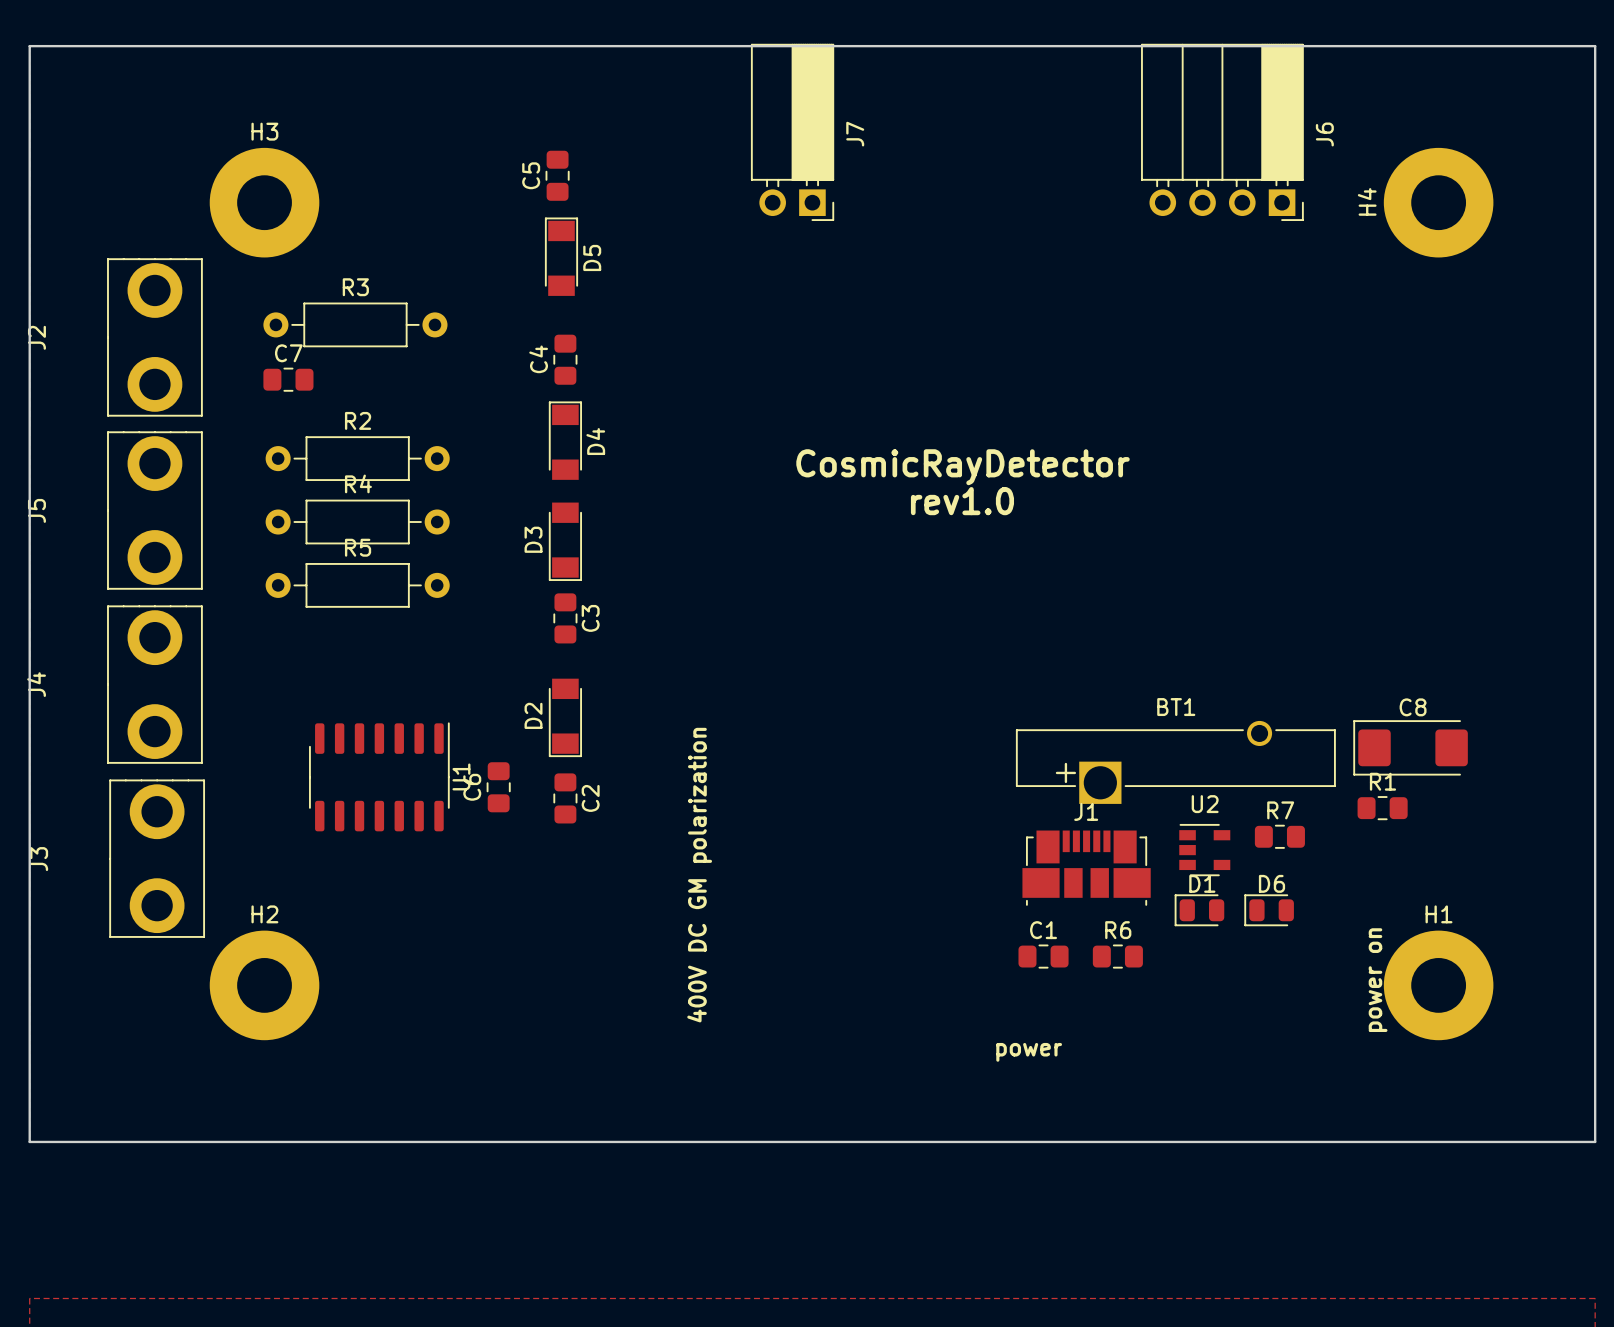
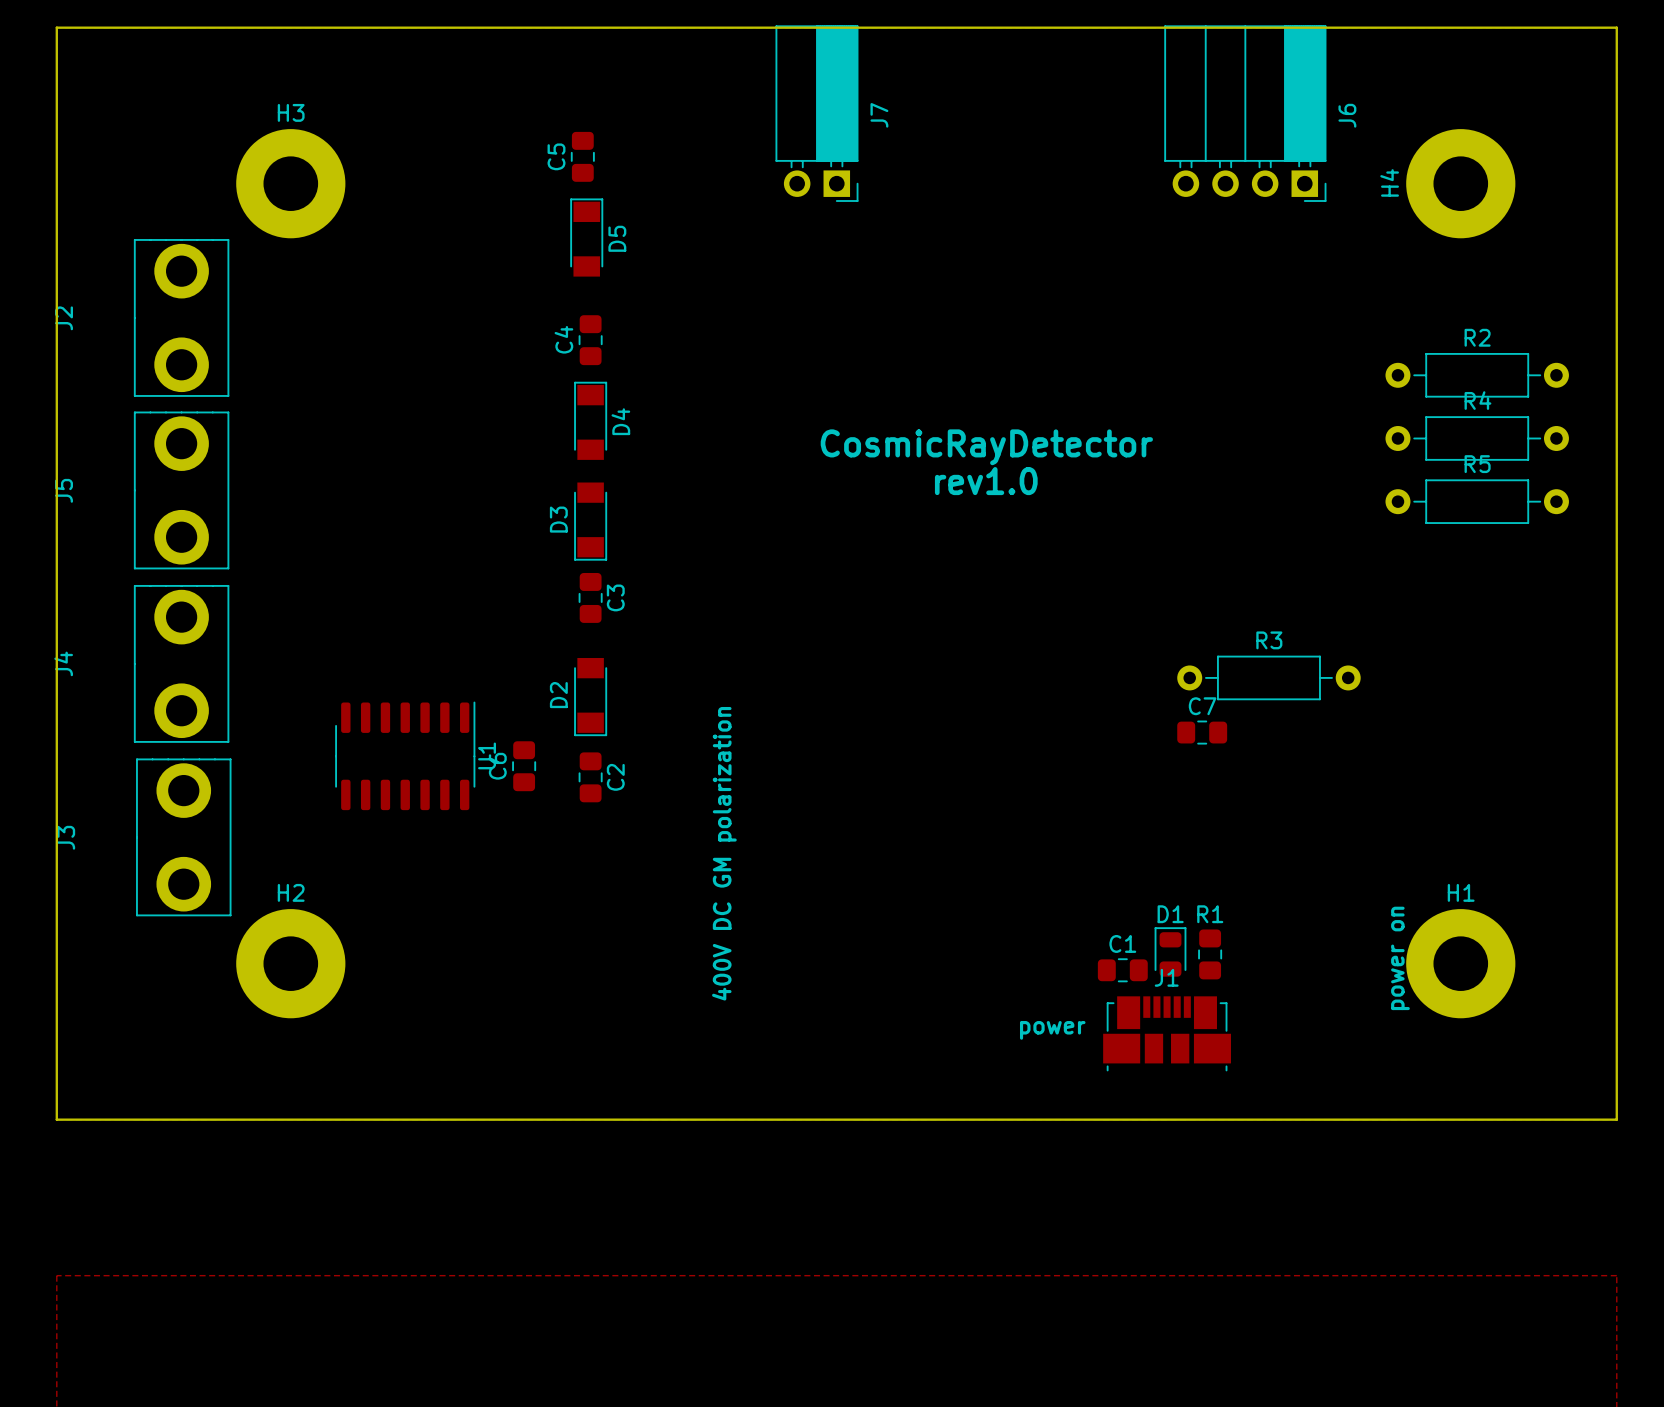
R3 position: (355, 324) -> (1268, 677)
C7 position: (288, 379) -> (1202, 732)
R2 position: (357, 458) -> (1477, 375)
R4 position: (357, 522) -> (1477, 438)
R5 position: (357, 585) -> (1477, 501)
C8: (1410, 747) -> none
BT1: (1175, 762) -> none
R1 rotation: 0° (1382, 808) -> 90° clockwise (1210, 954)
R1 position: (1382, 808) -> (1210, 954)
R7: (1279, 836) -> none
U2: (1204, 850) -> none
J1 position: (1086, 868) -> (1167, 1033)
D1 rotation: 0° (1199, 910) -> 90° clockwise (1170, 951)
D1 position: (1199, 910) -> (1170, 951)
D6: (1269, 910) -> none
C1 position: (1043, 956) -> (1122, 970)
R6: (1117, 956) -> none

